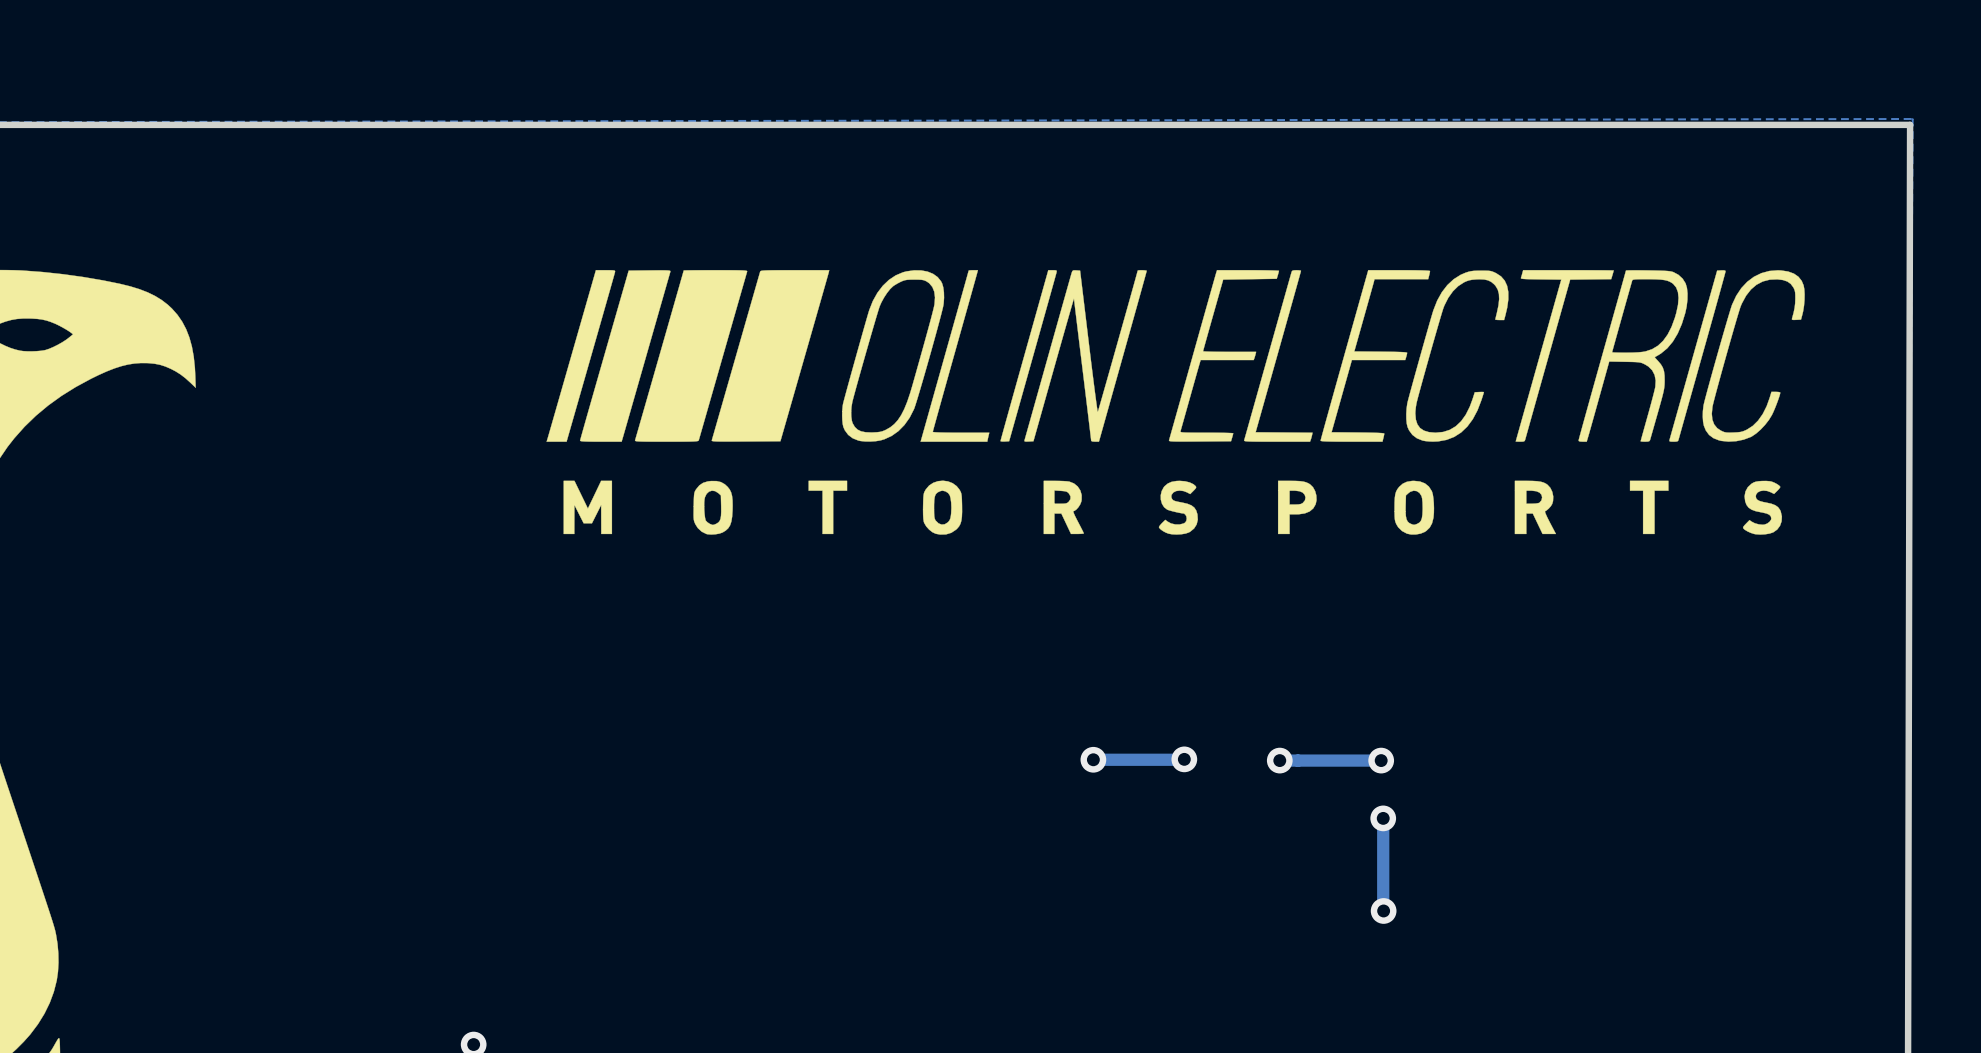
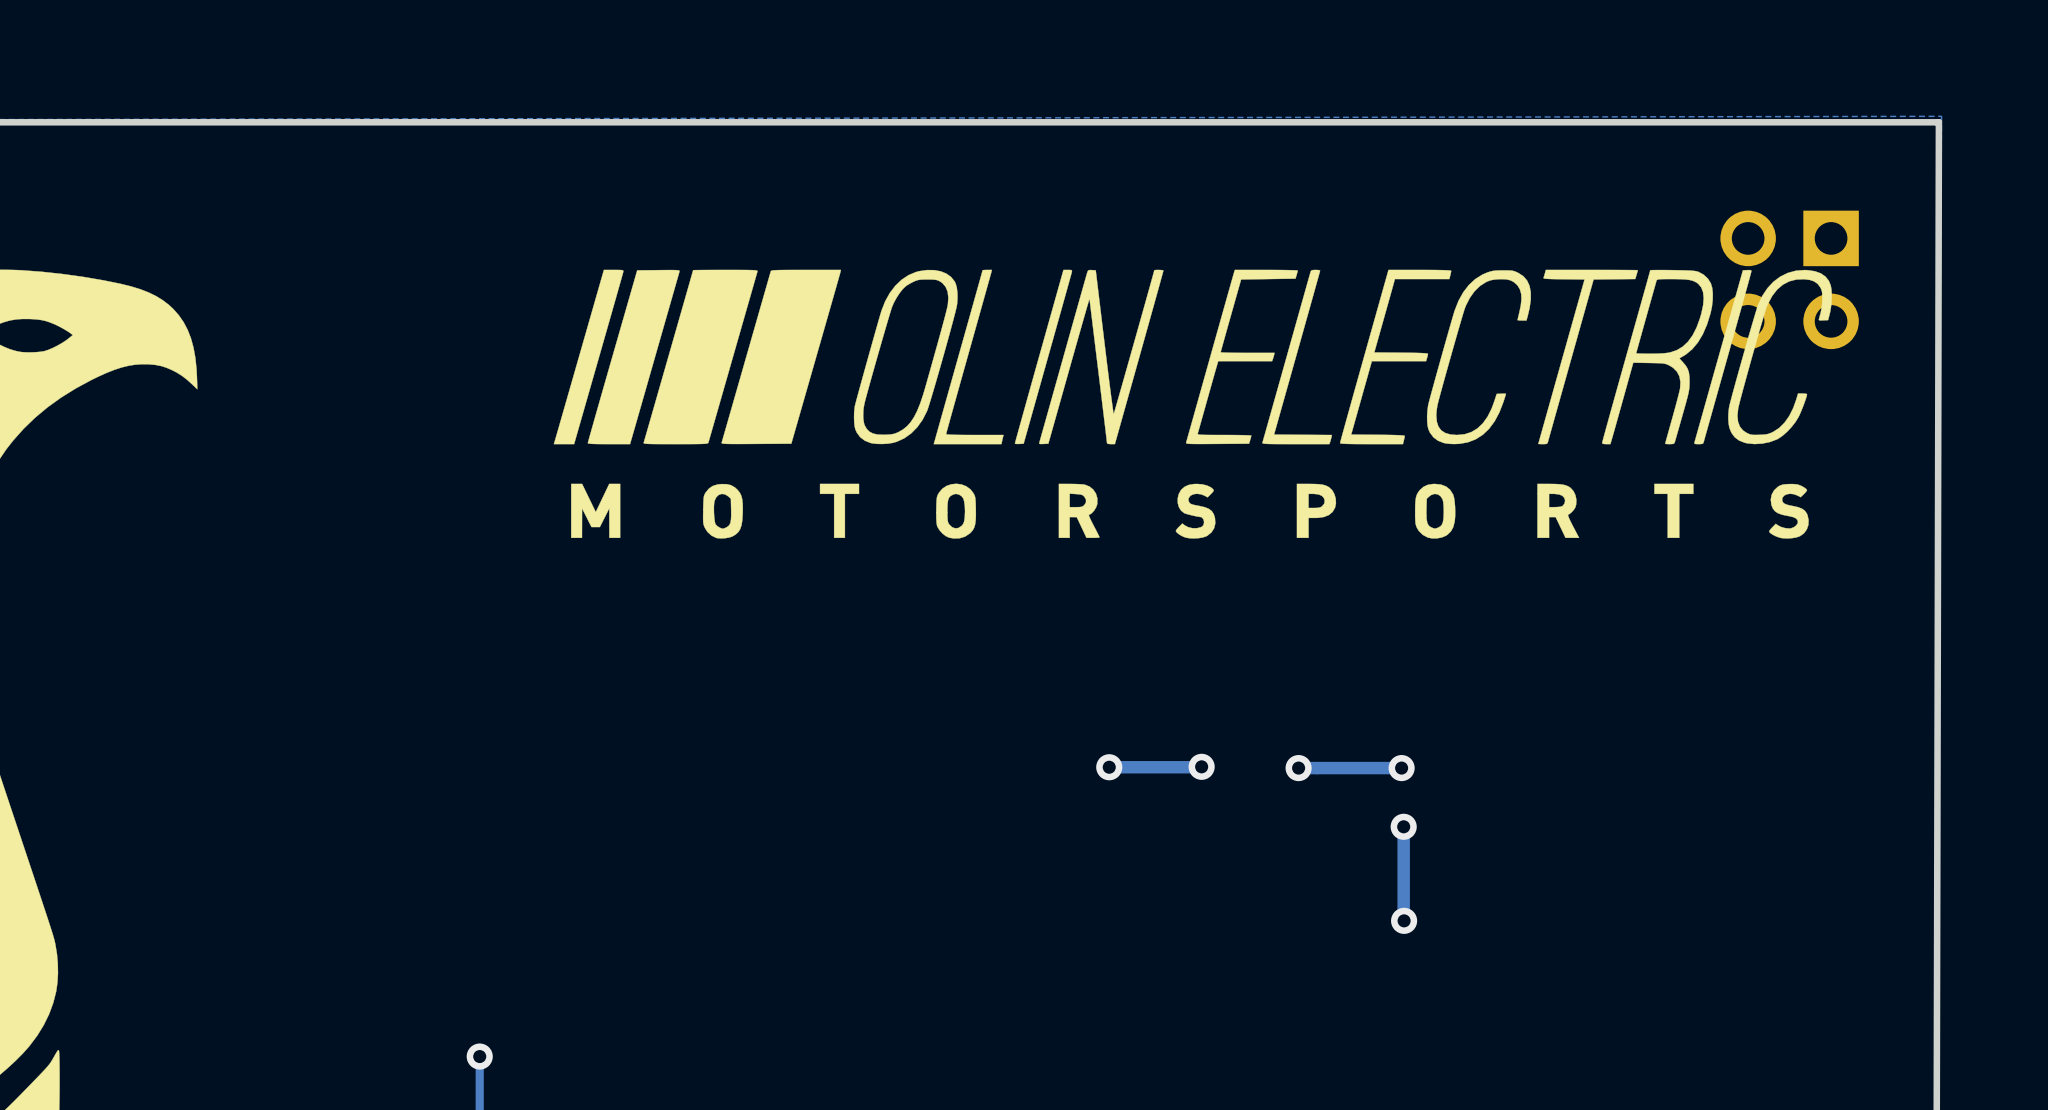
part: none -> (1789, 279)

